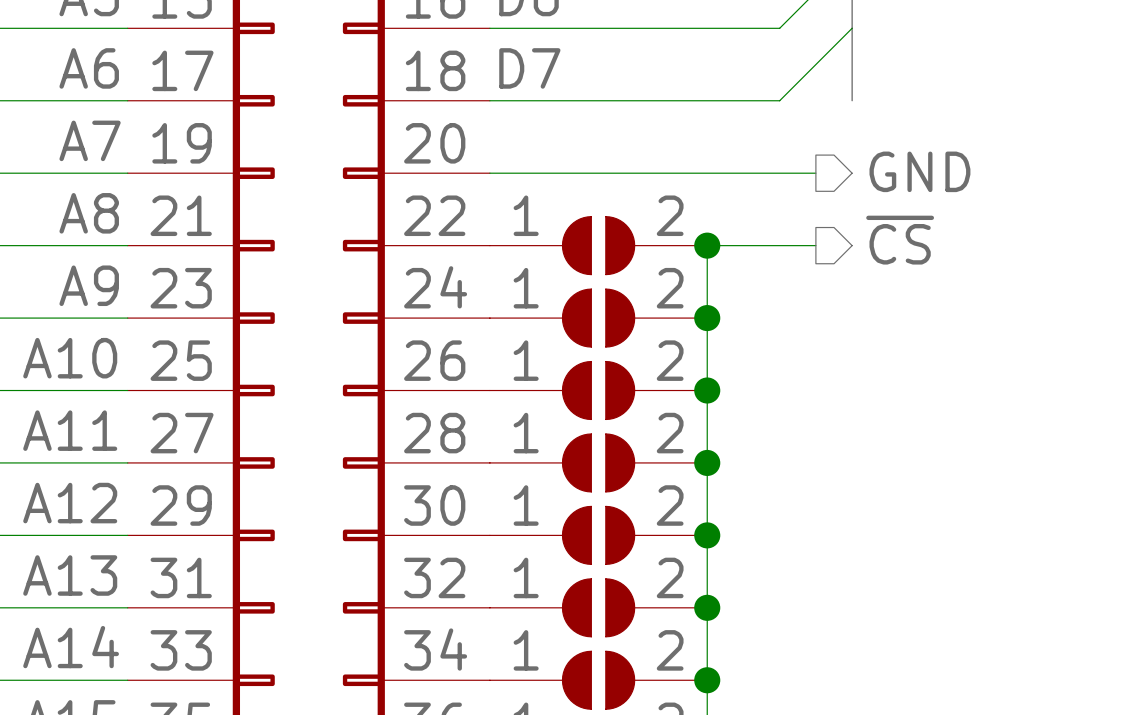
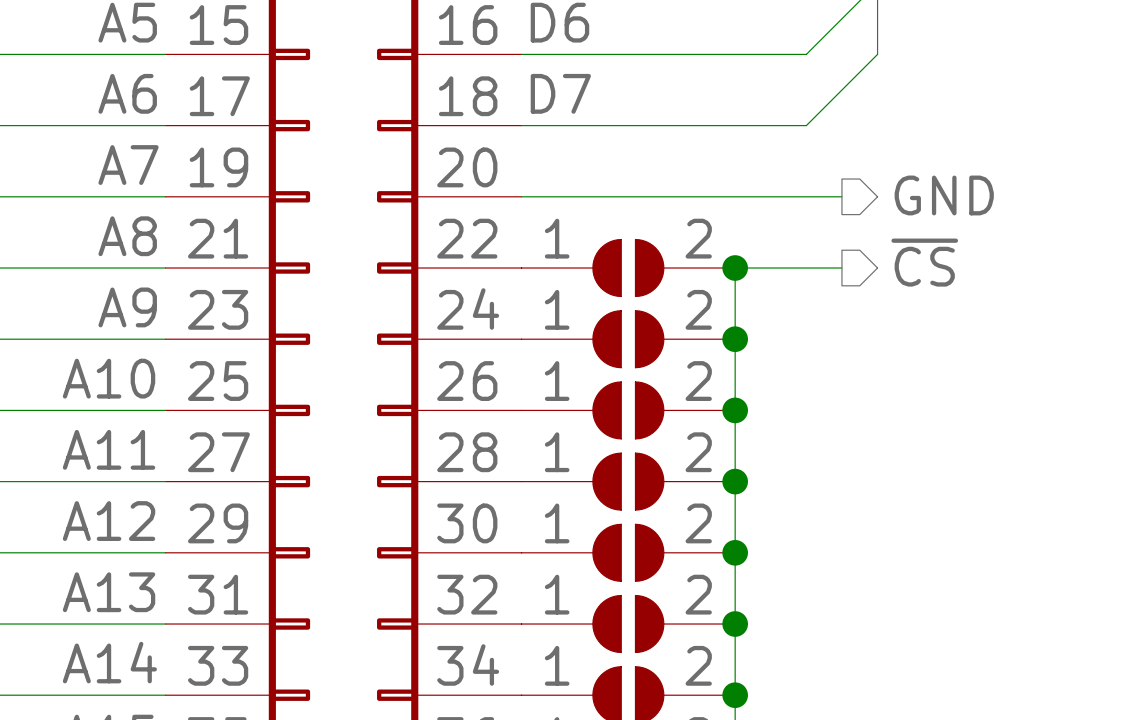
bus: (852, 28) (852, 100) -> none

